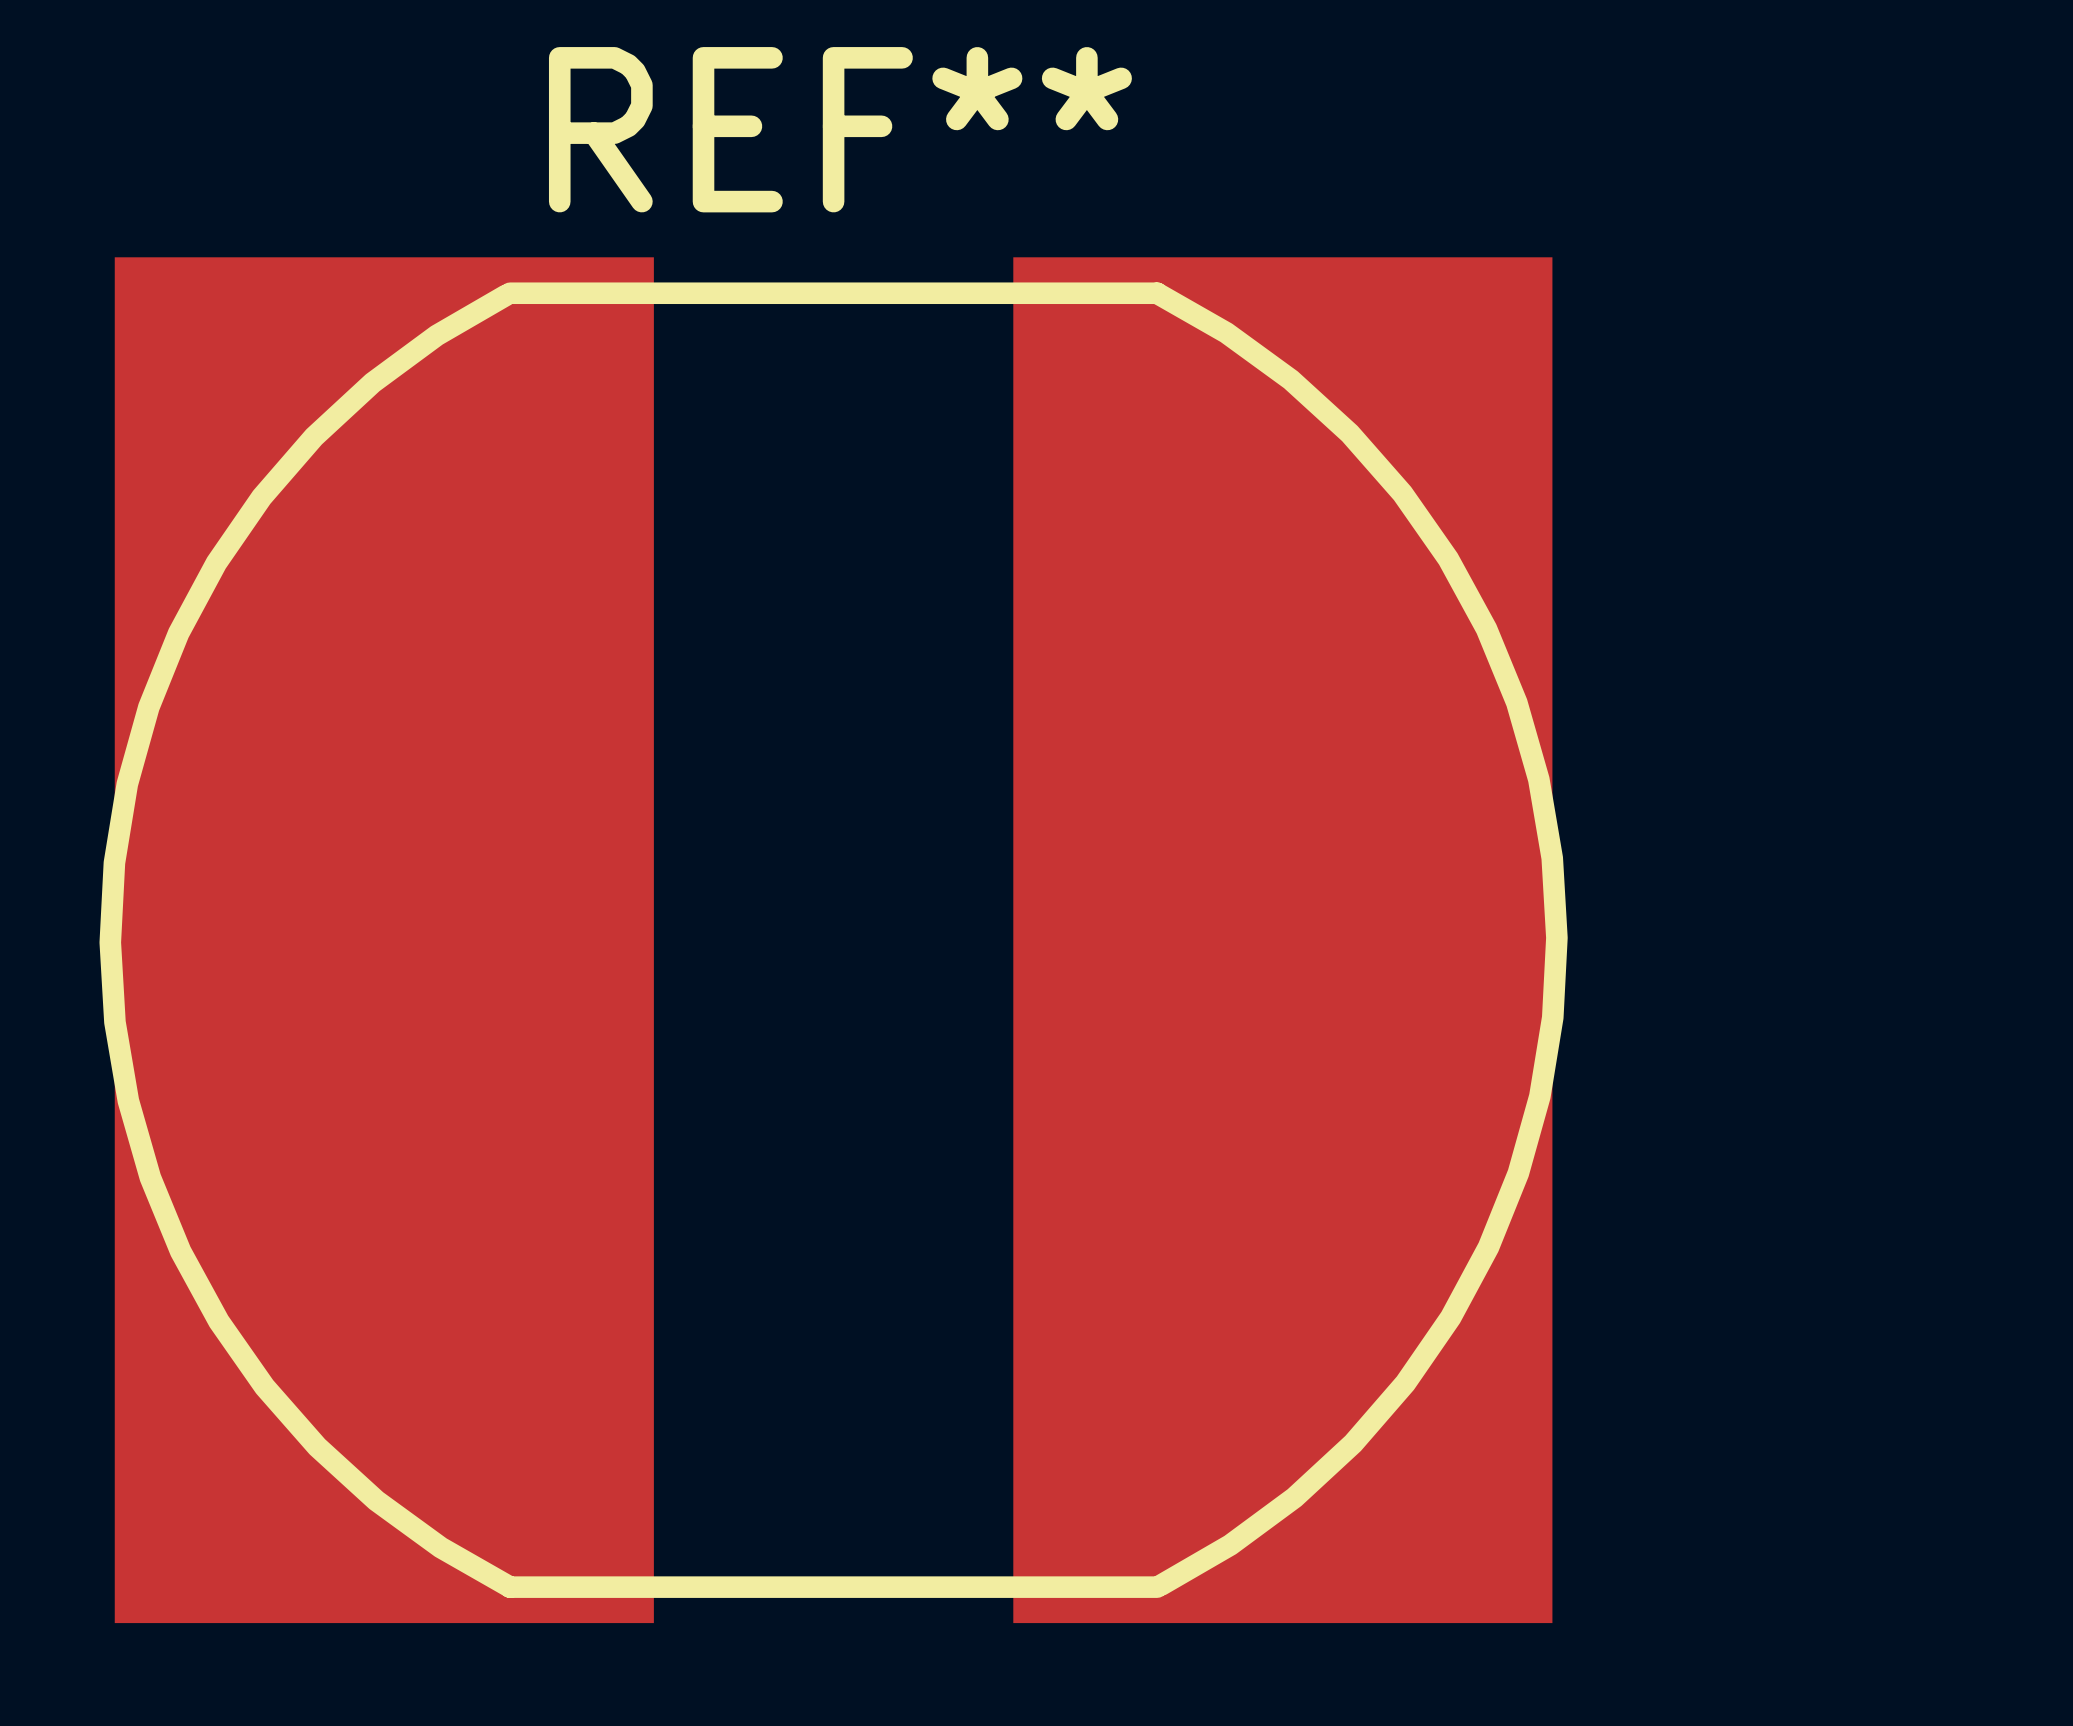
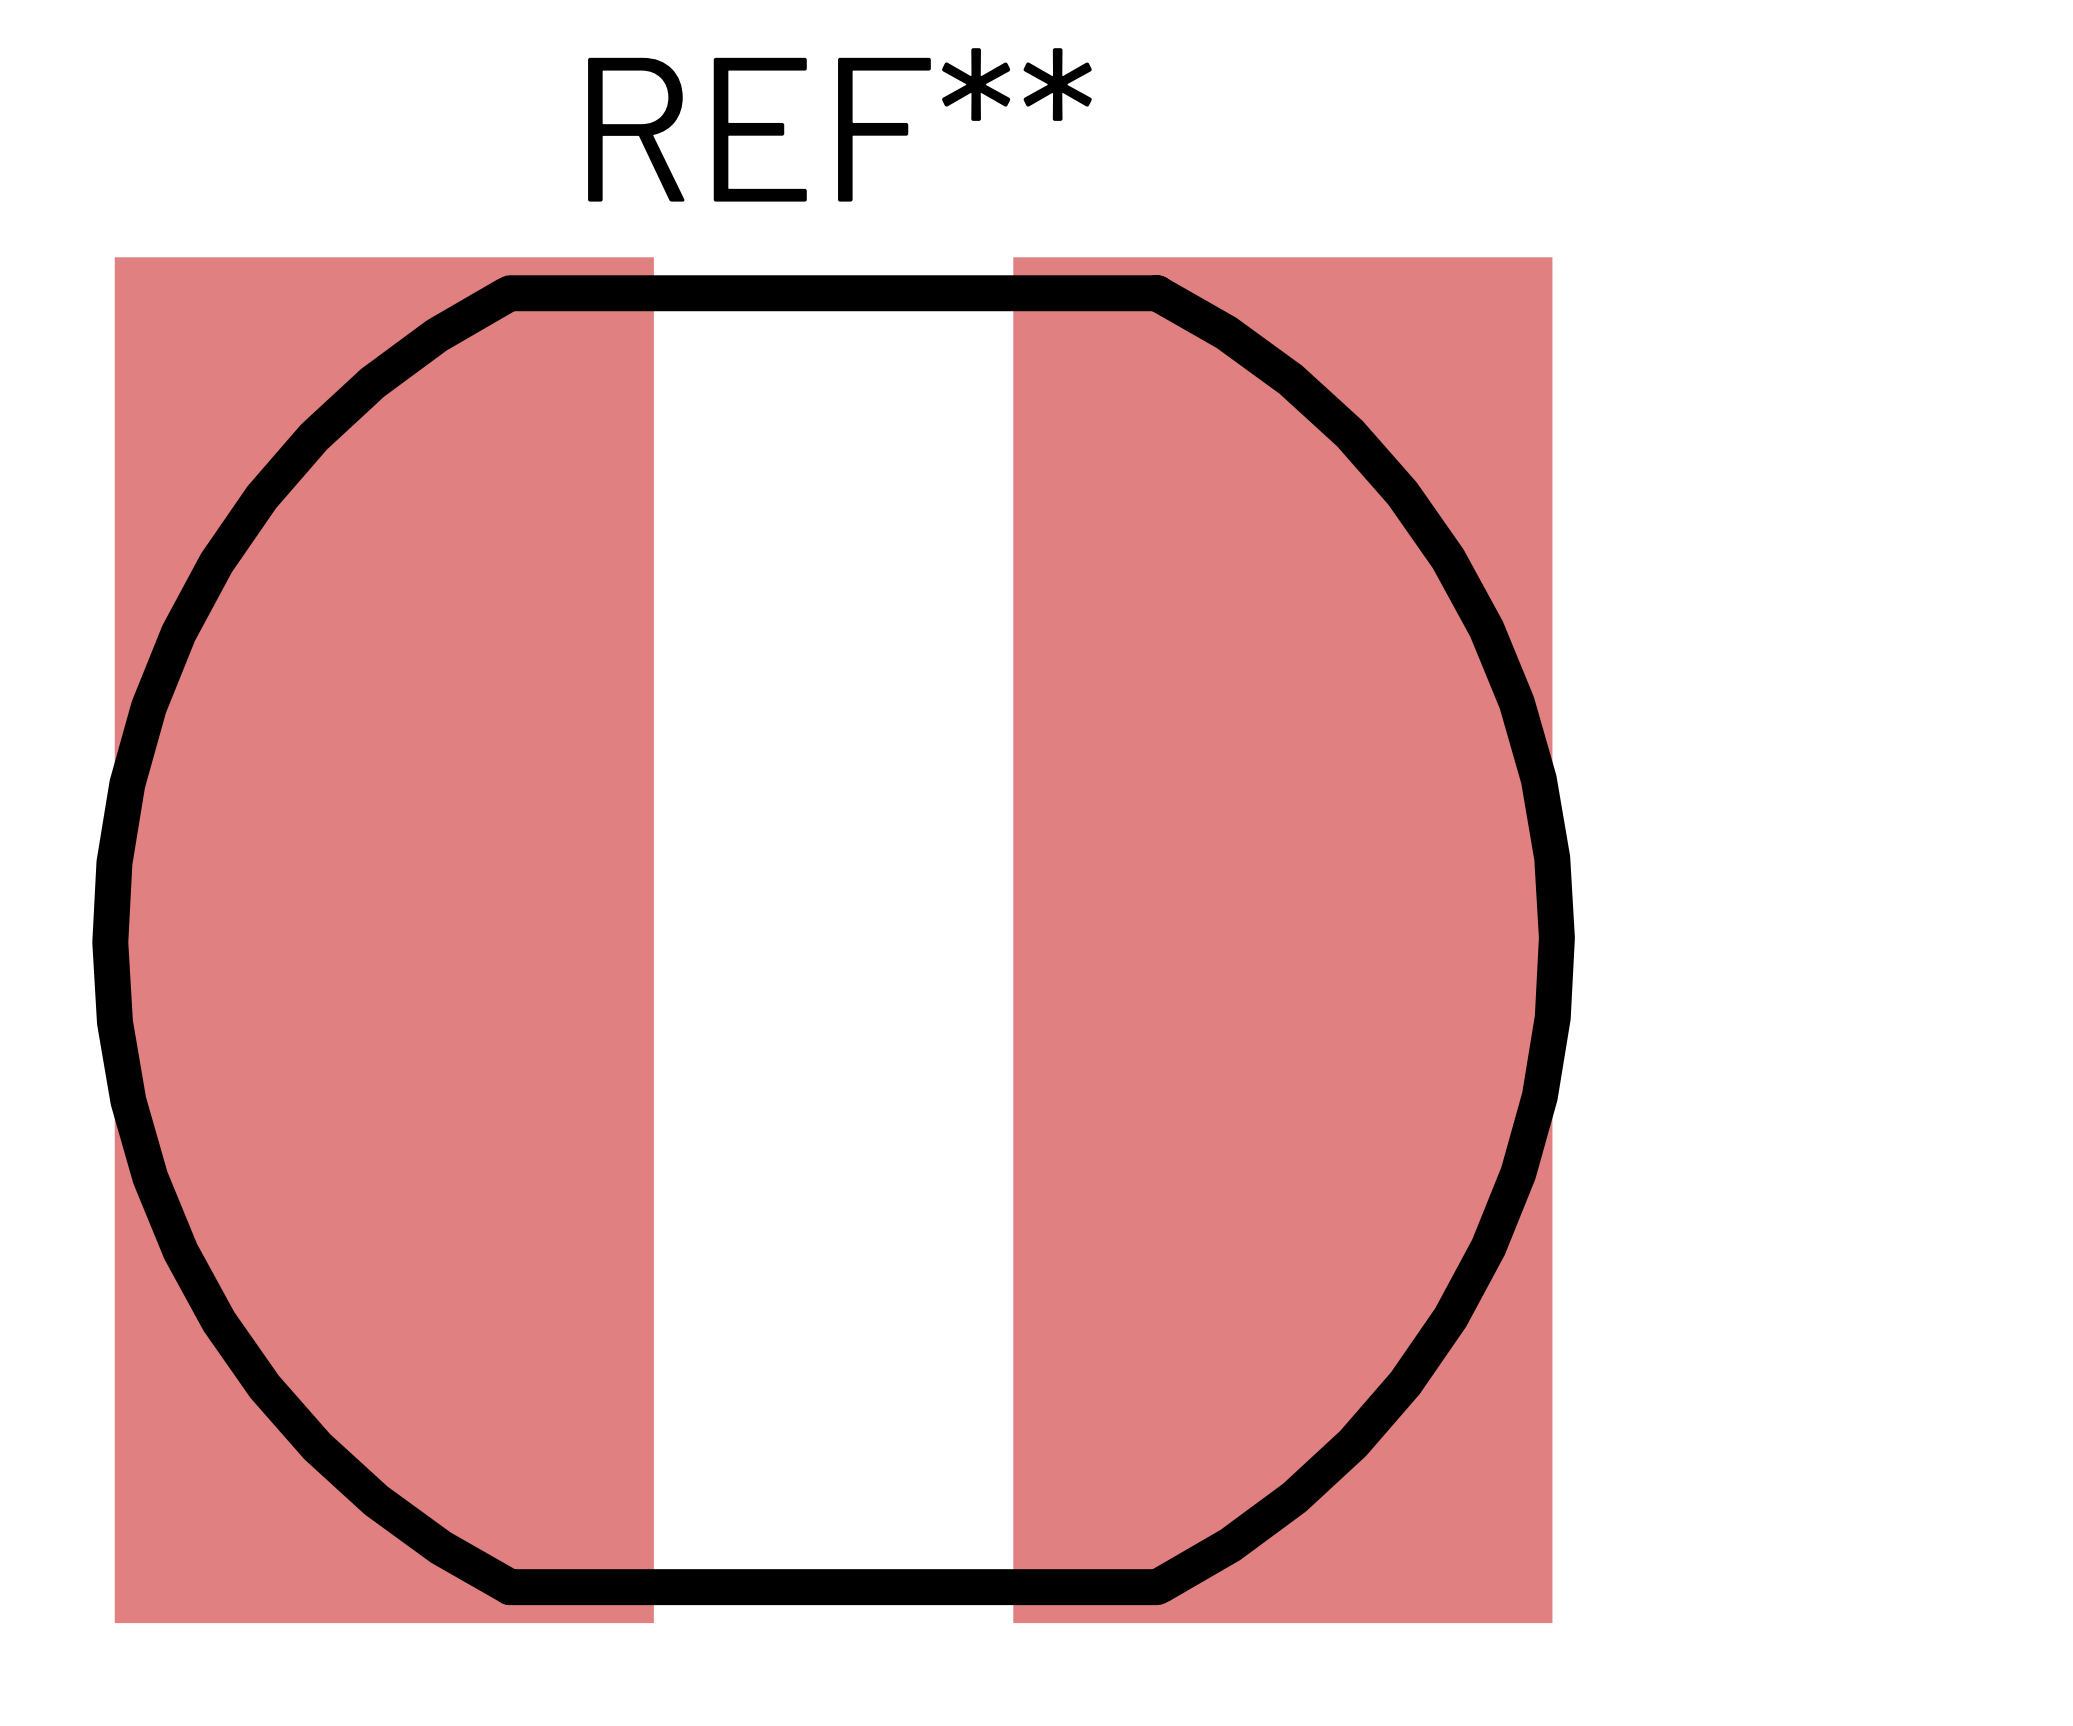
REF** footprint: [99, 257, 1568, 1624] -> [92, 257, 1575, 1624]

